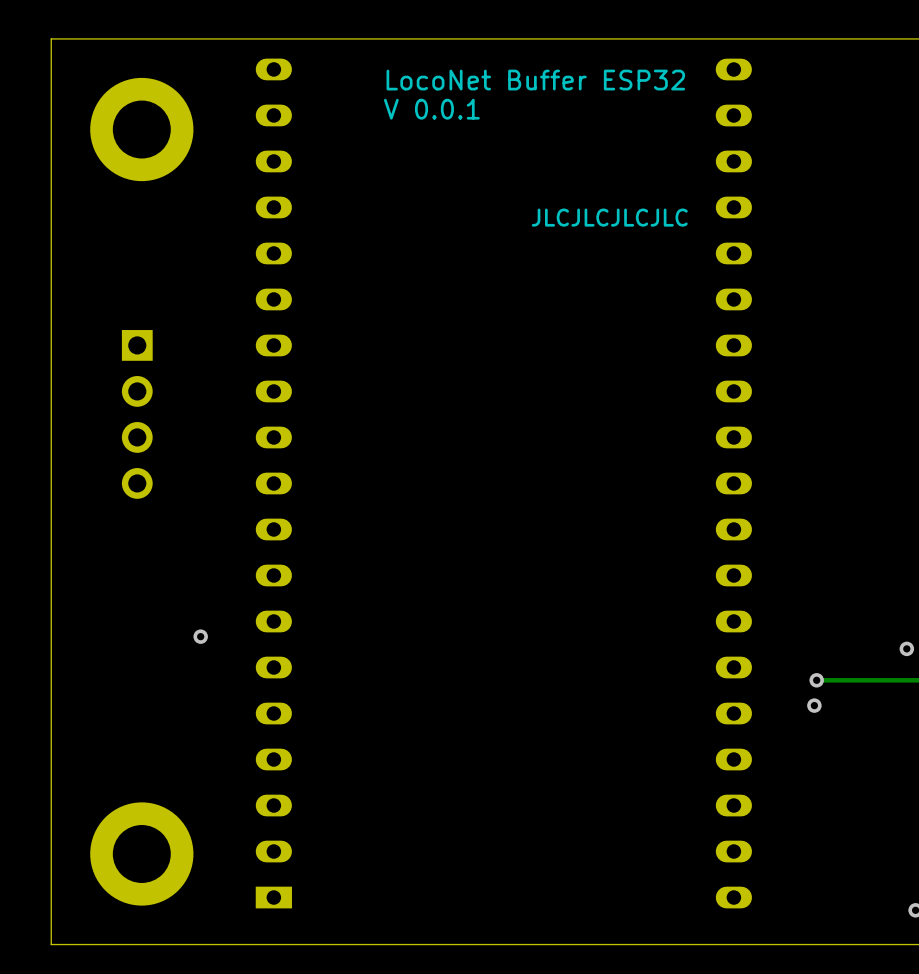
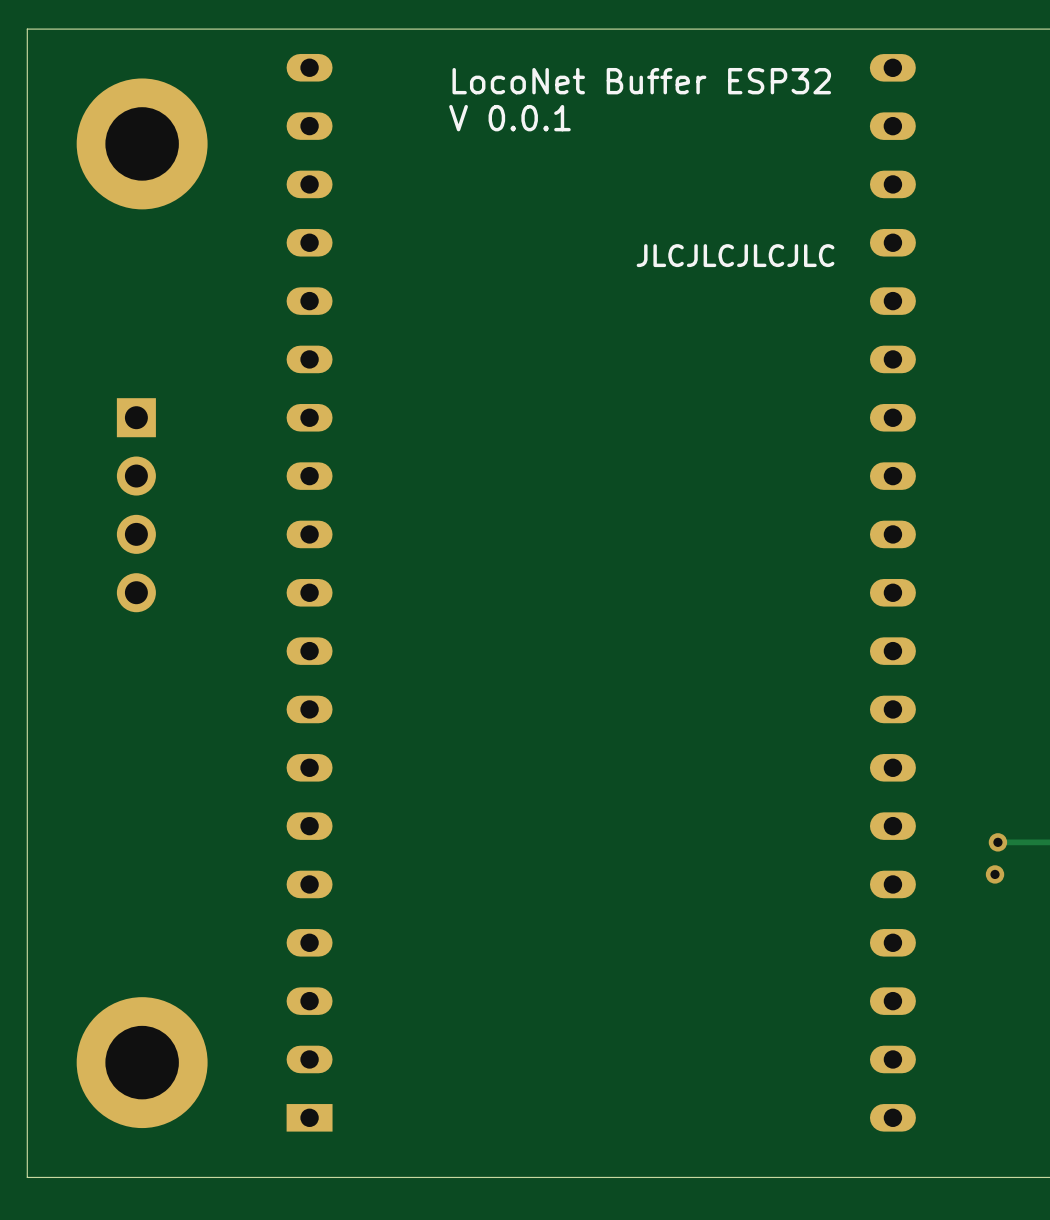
via: (200, 636) -> none

